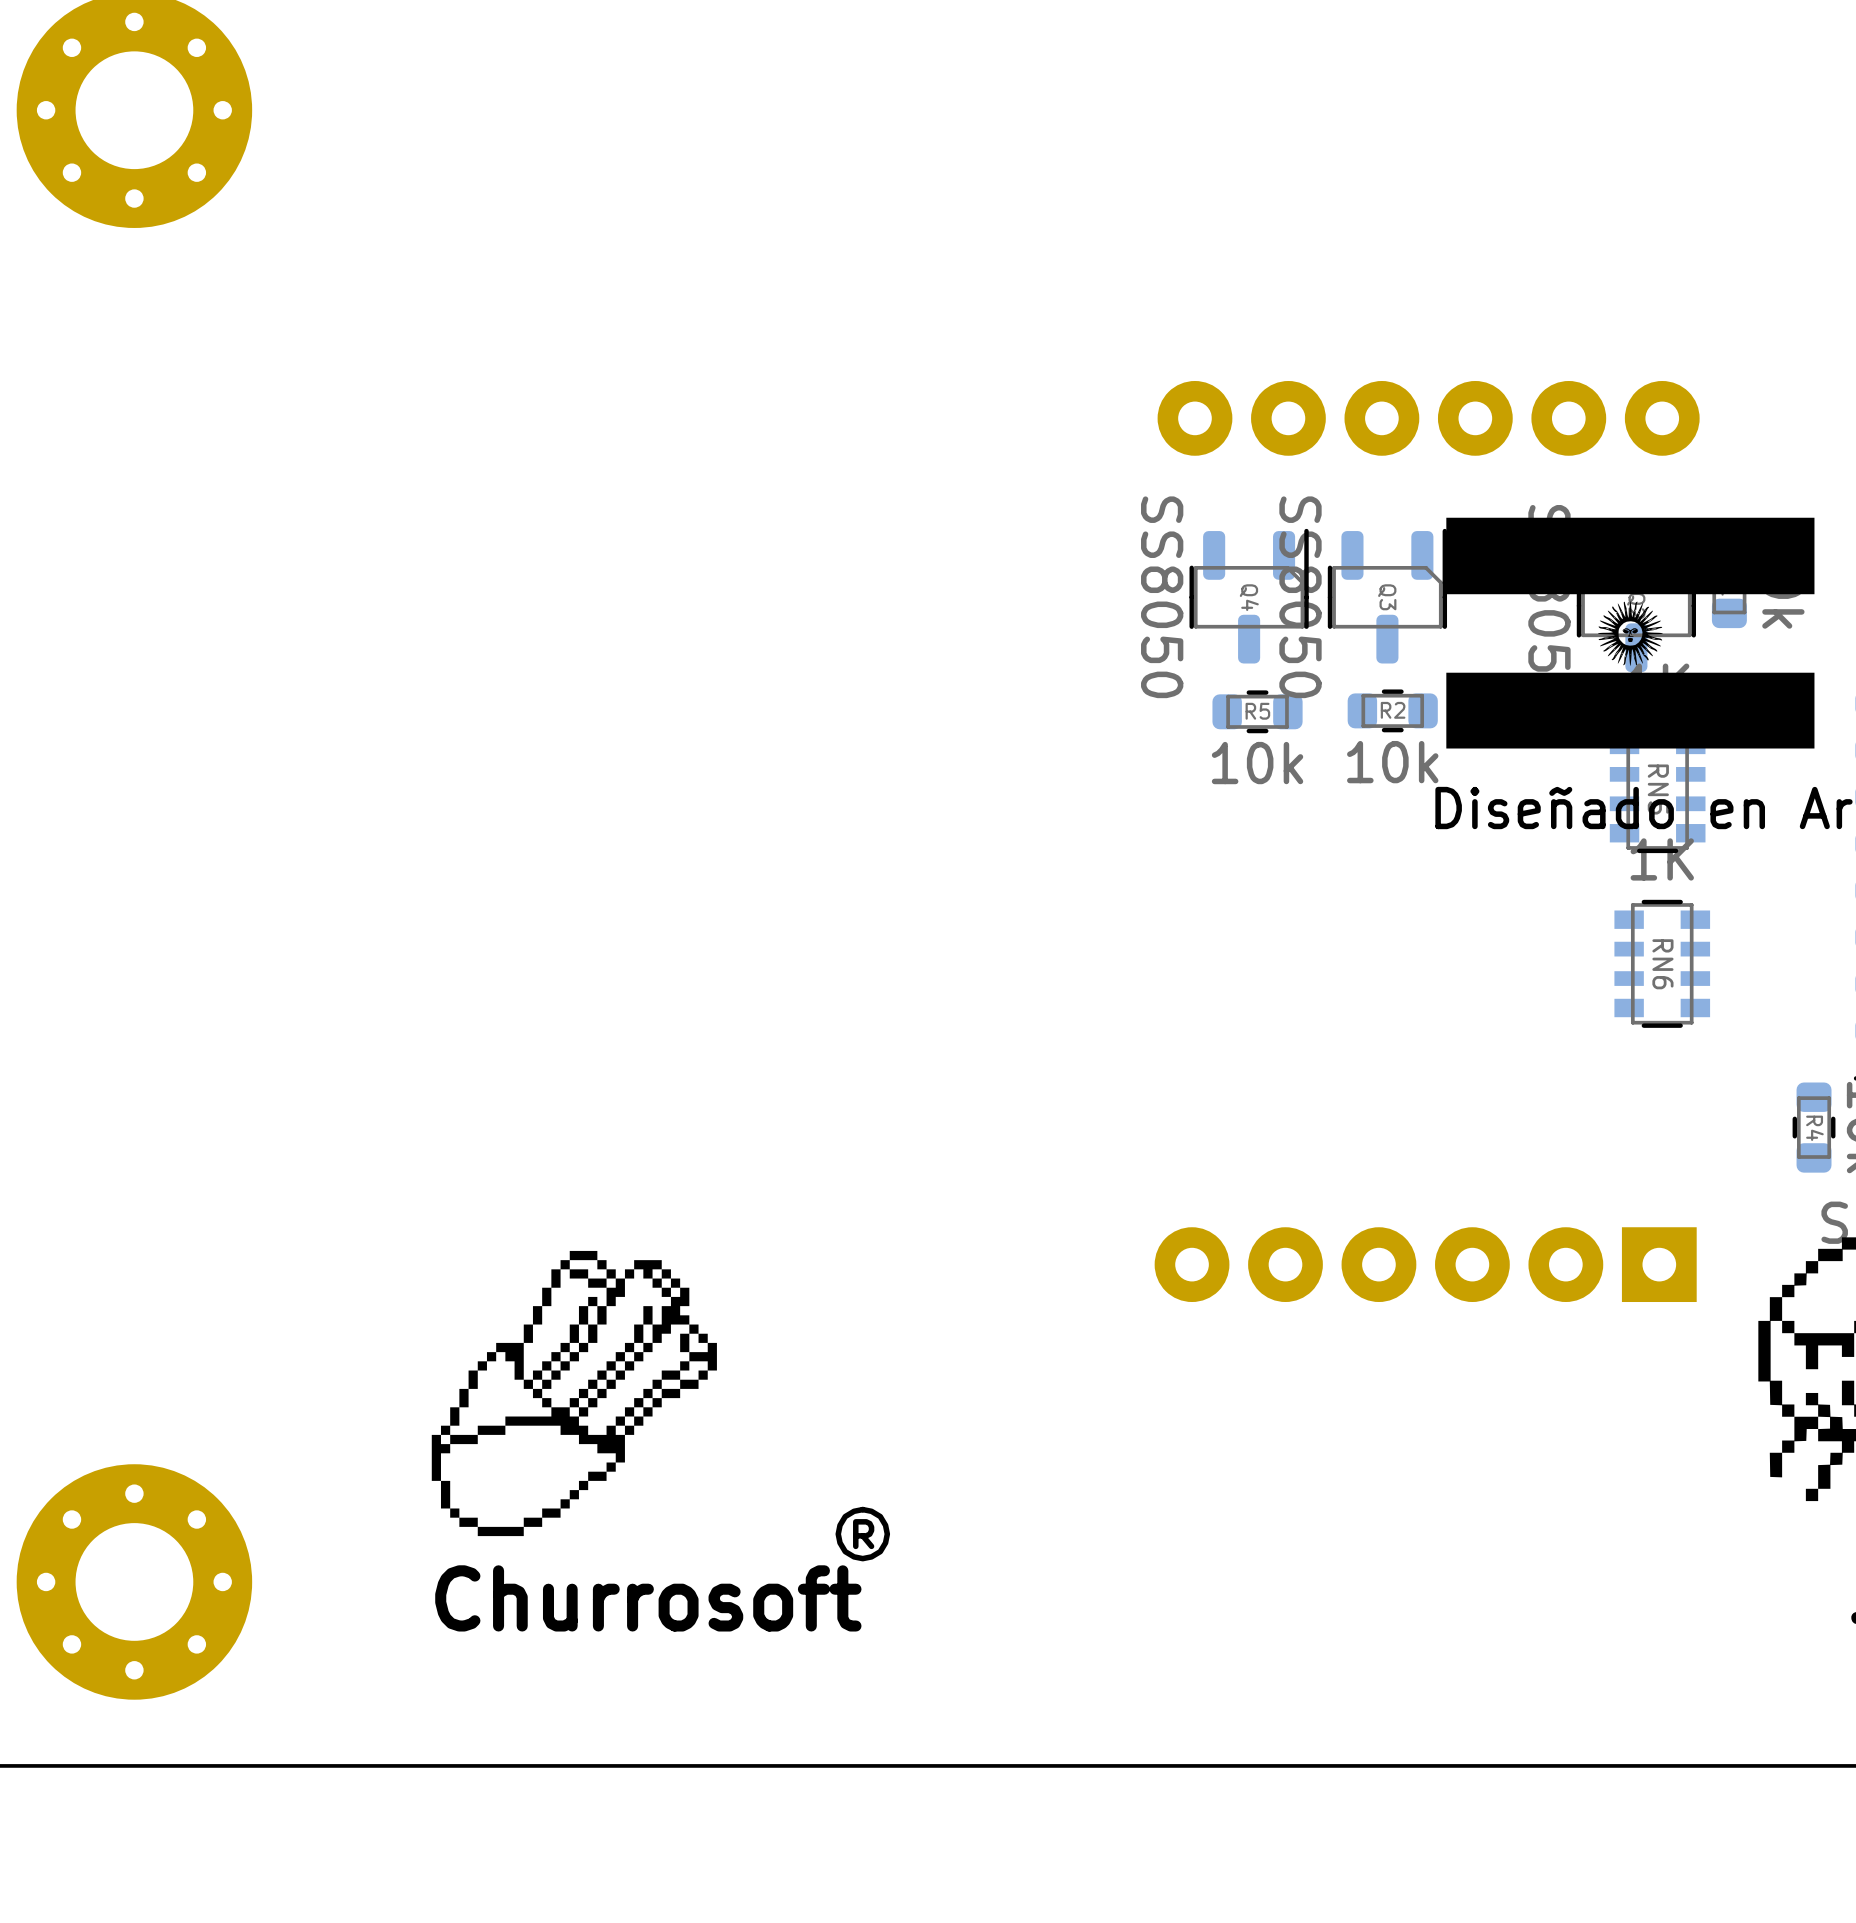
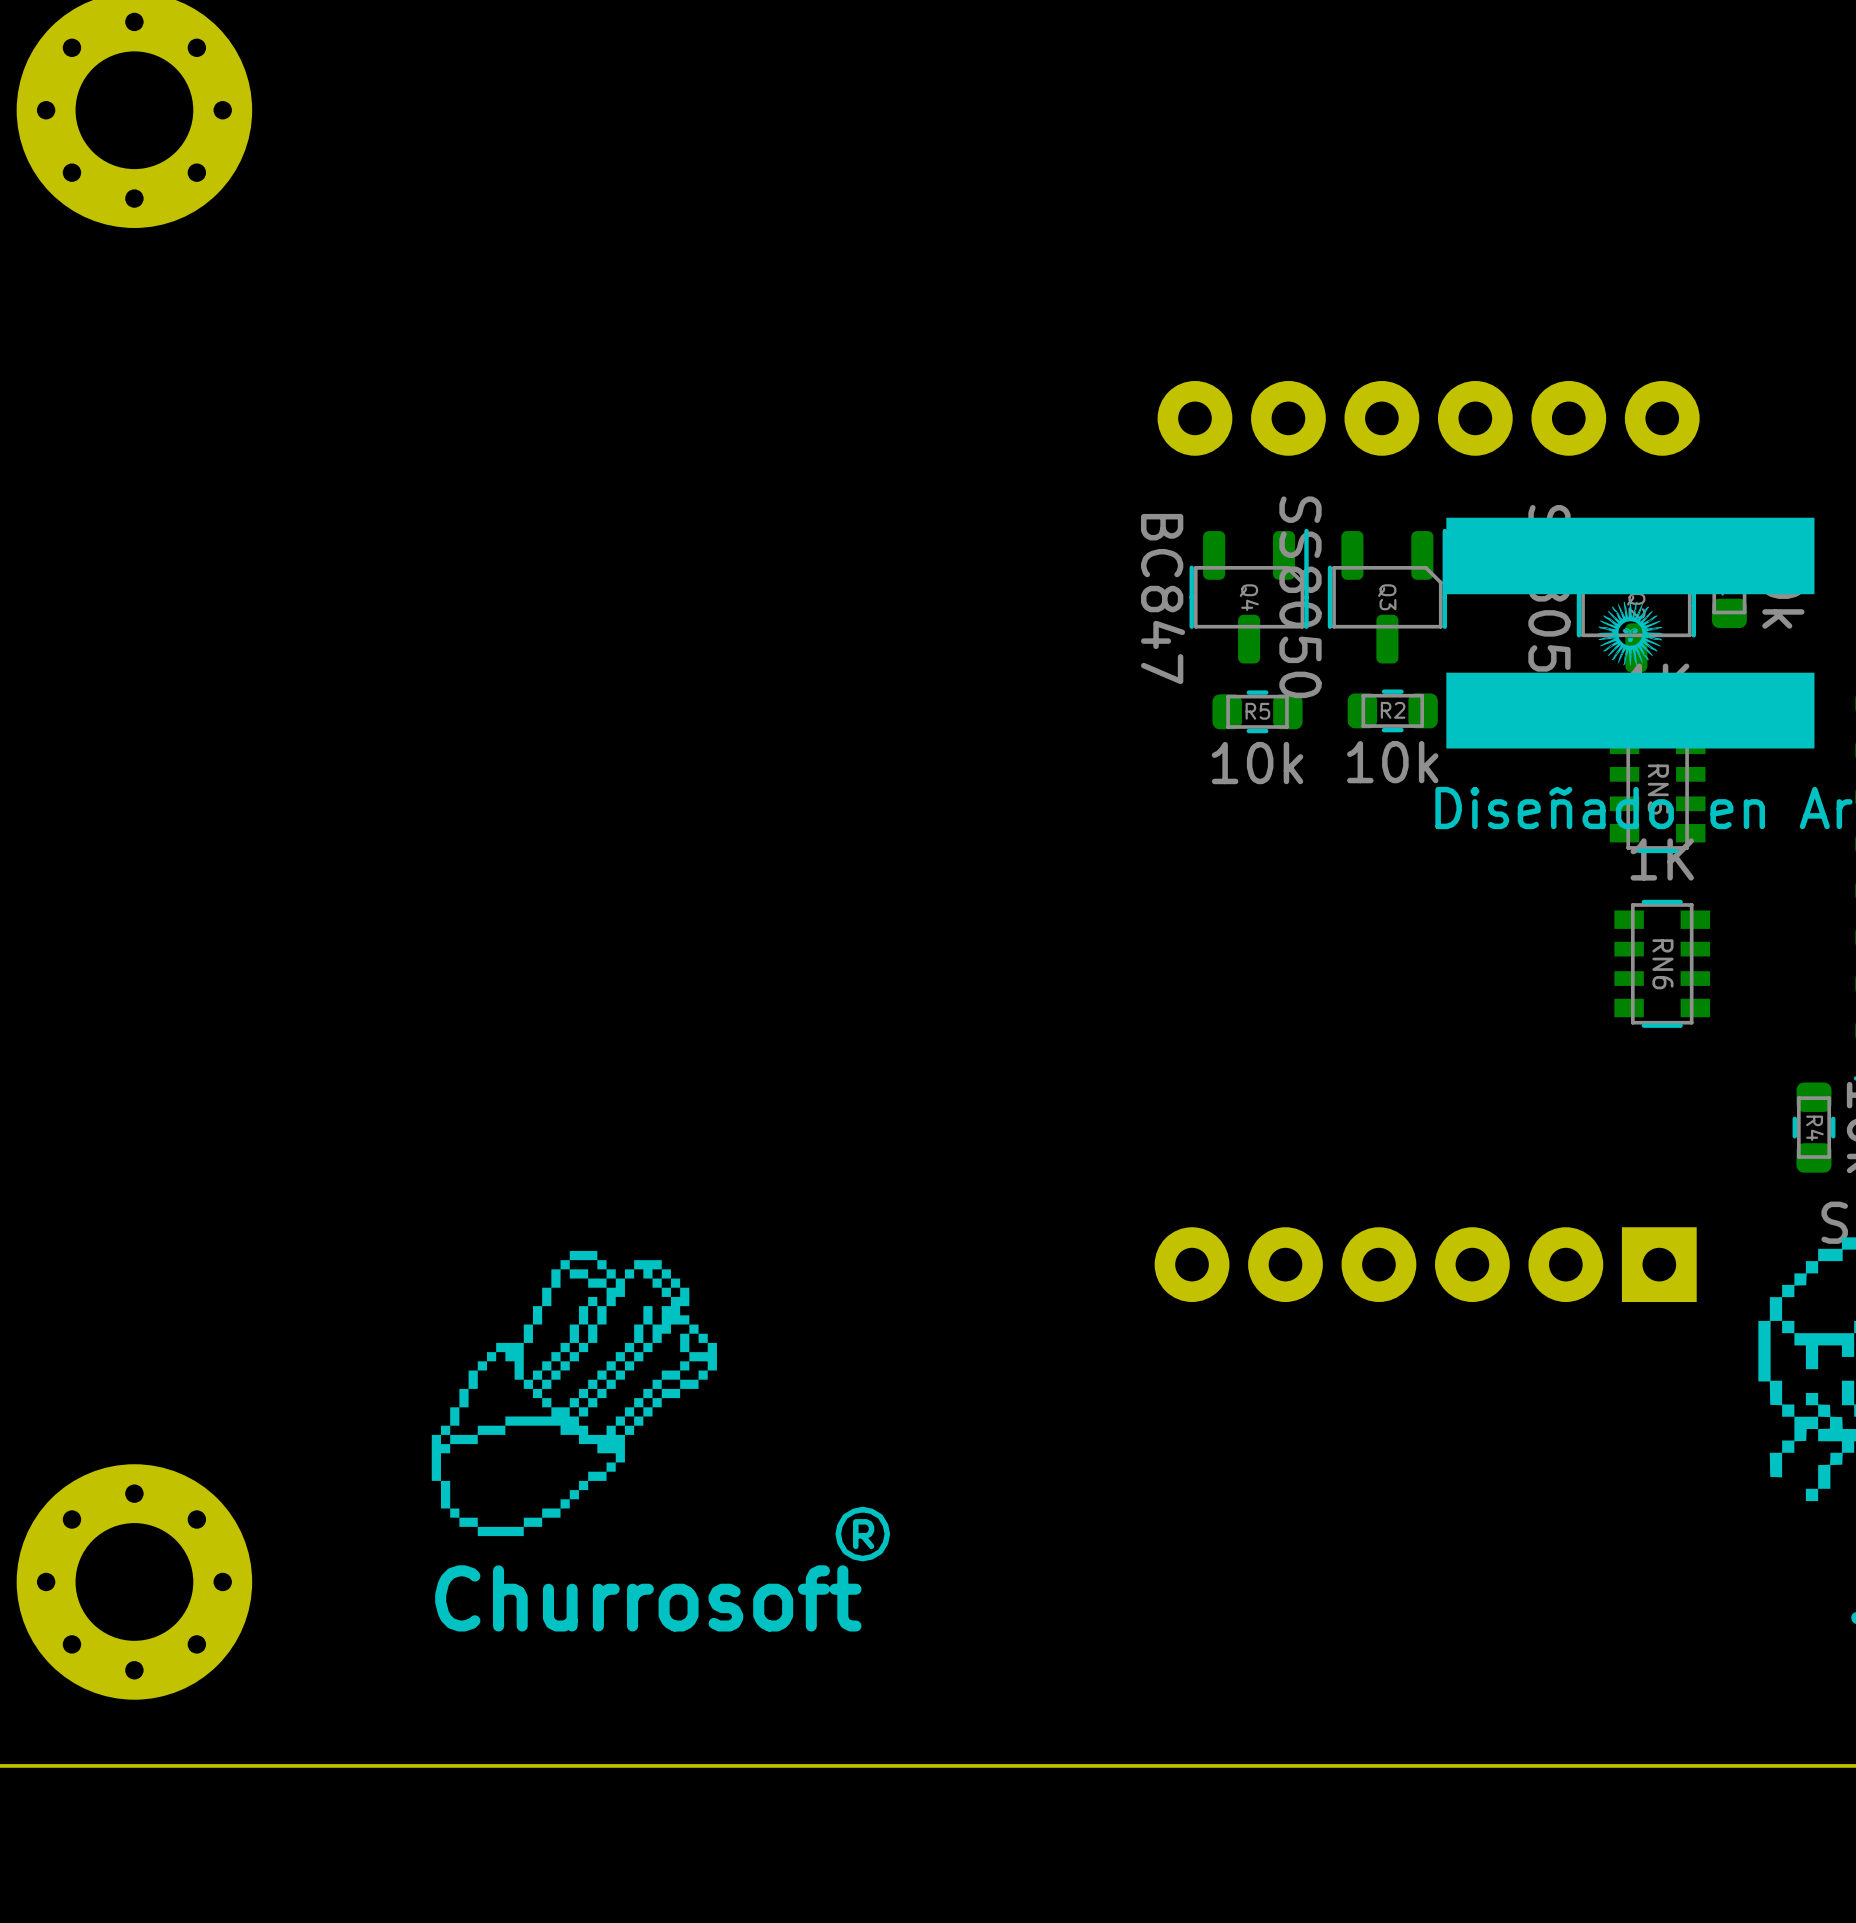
Q4 value: SS8050 (1162, 597) -> BC847 (1163, 599)

